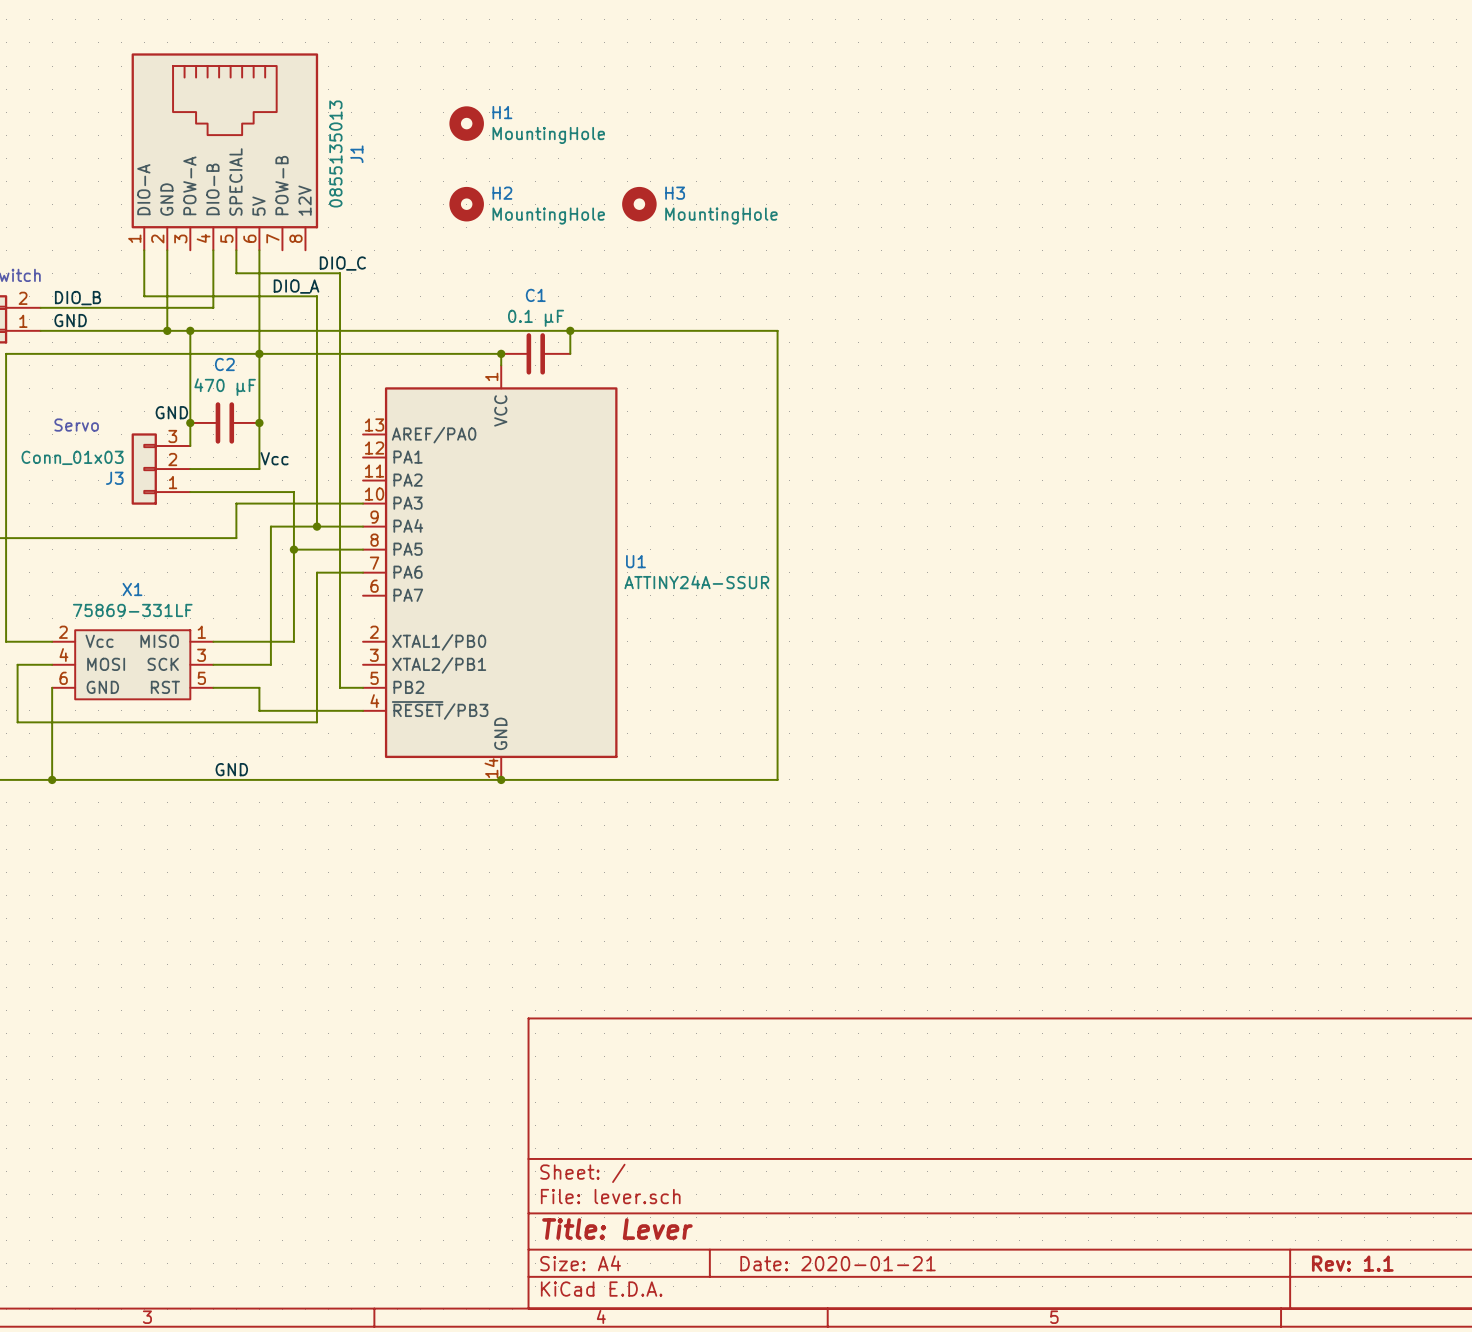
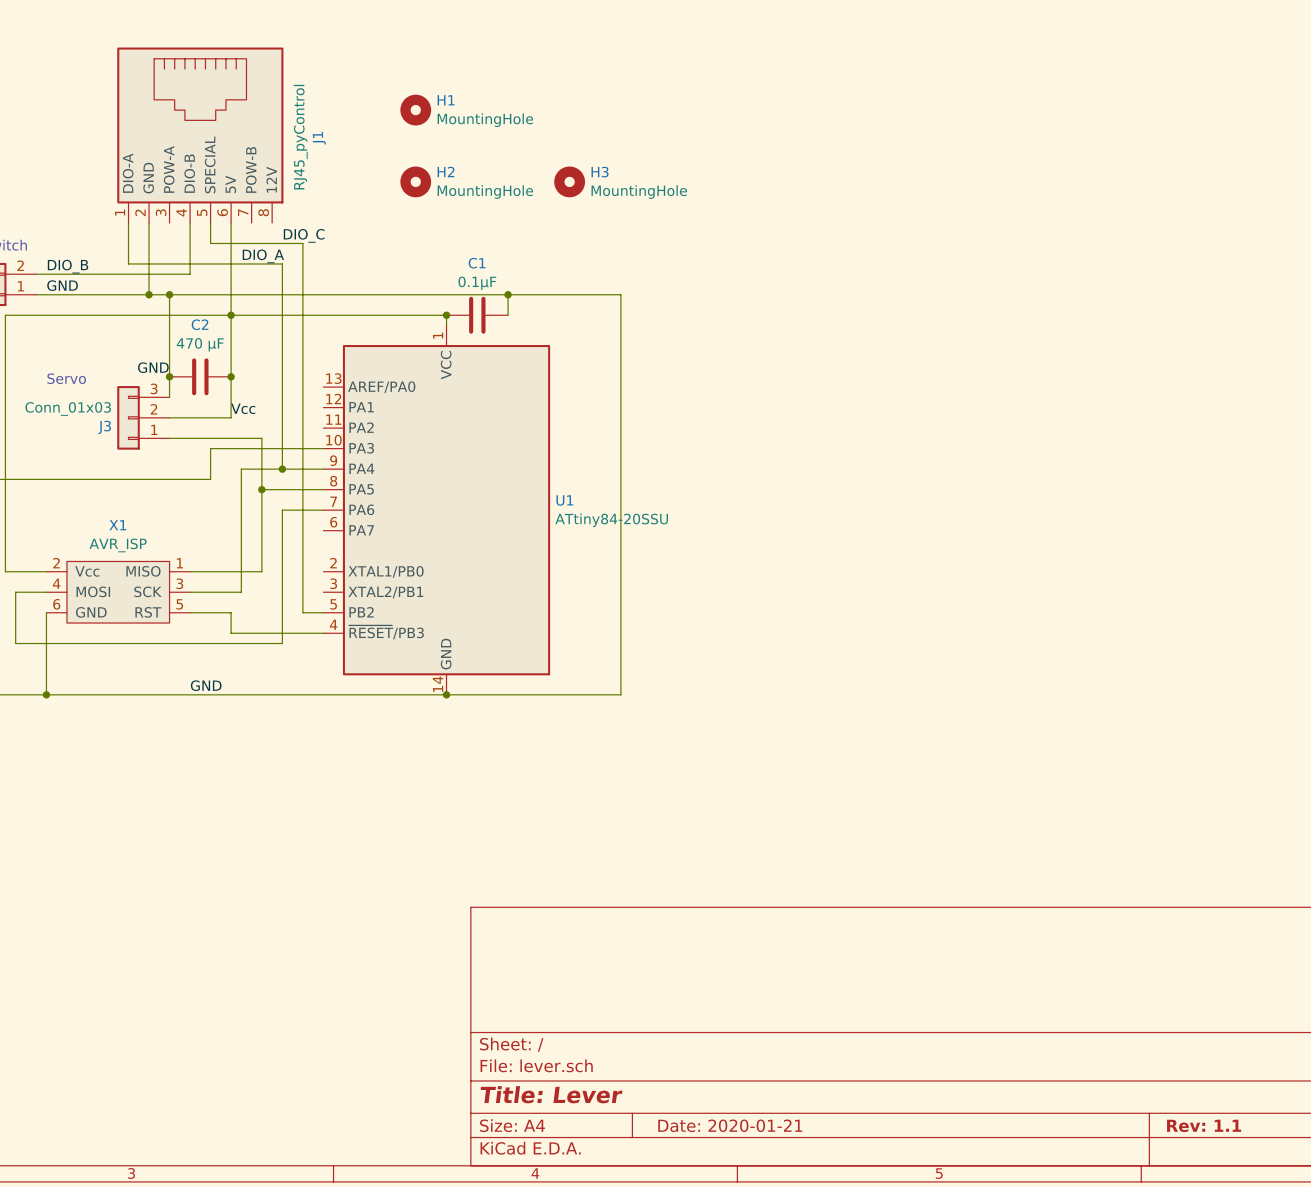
J1 value: 0855135013 (335, 153) -> RJ45_pyControl (300, 137)
C1 value: 0.1 µF (536, 318) -> 0.1µF (477, 283)
wire: (696, 330) (777, 330) (777, 779) (696, 779) -> (620, 294) (620, 694)
U1 value: ATTINY24A-SSUR (696, 582) -> ATtiny84-20SSU (611, 520)
X1 value: 75869-331LF (132, 610) -> AVR_ISP (118, 545)

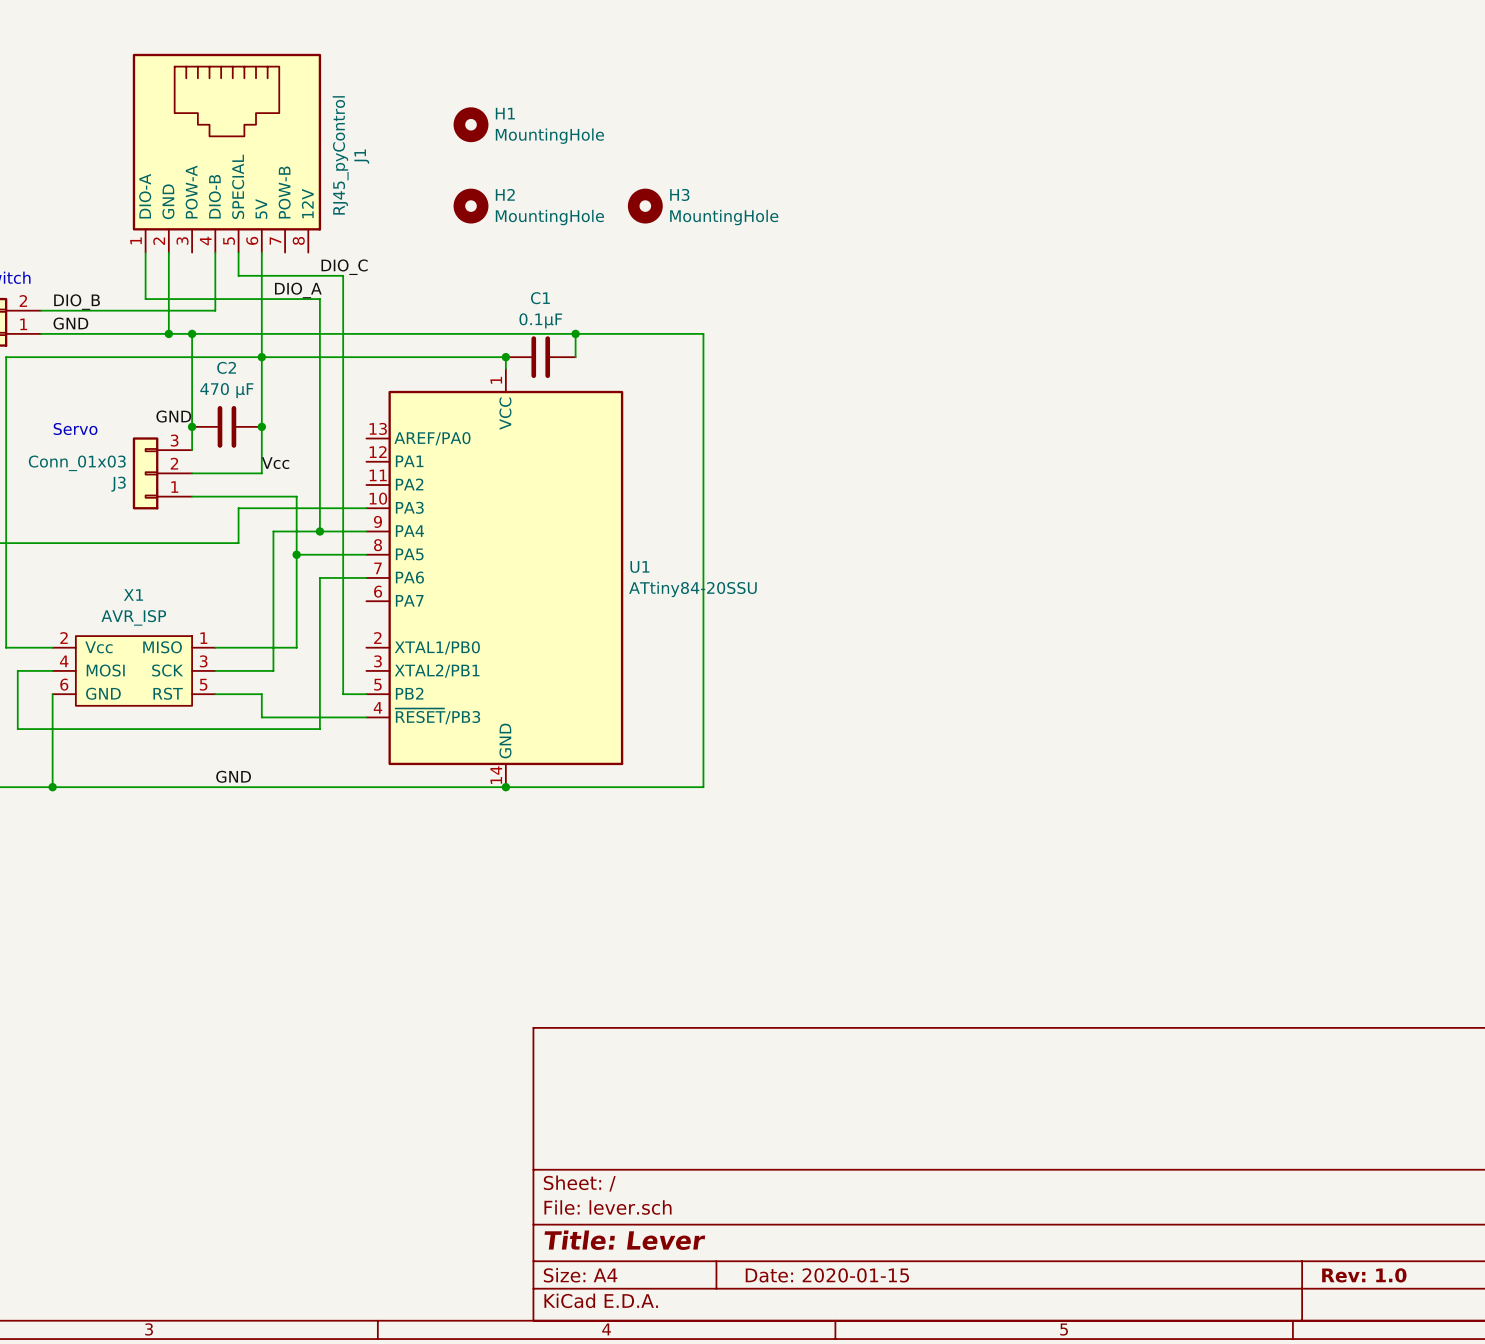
title block: Date: 2020-01-21 (730, 1125) -> Date: 2020-01-15 (827, 1275)
title block: Rev: 1.1 (1204, 1125) -> Rev: 1.0 (1364, 1275)

